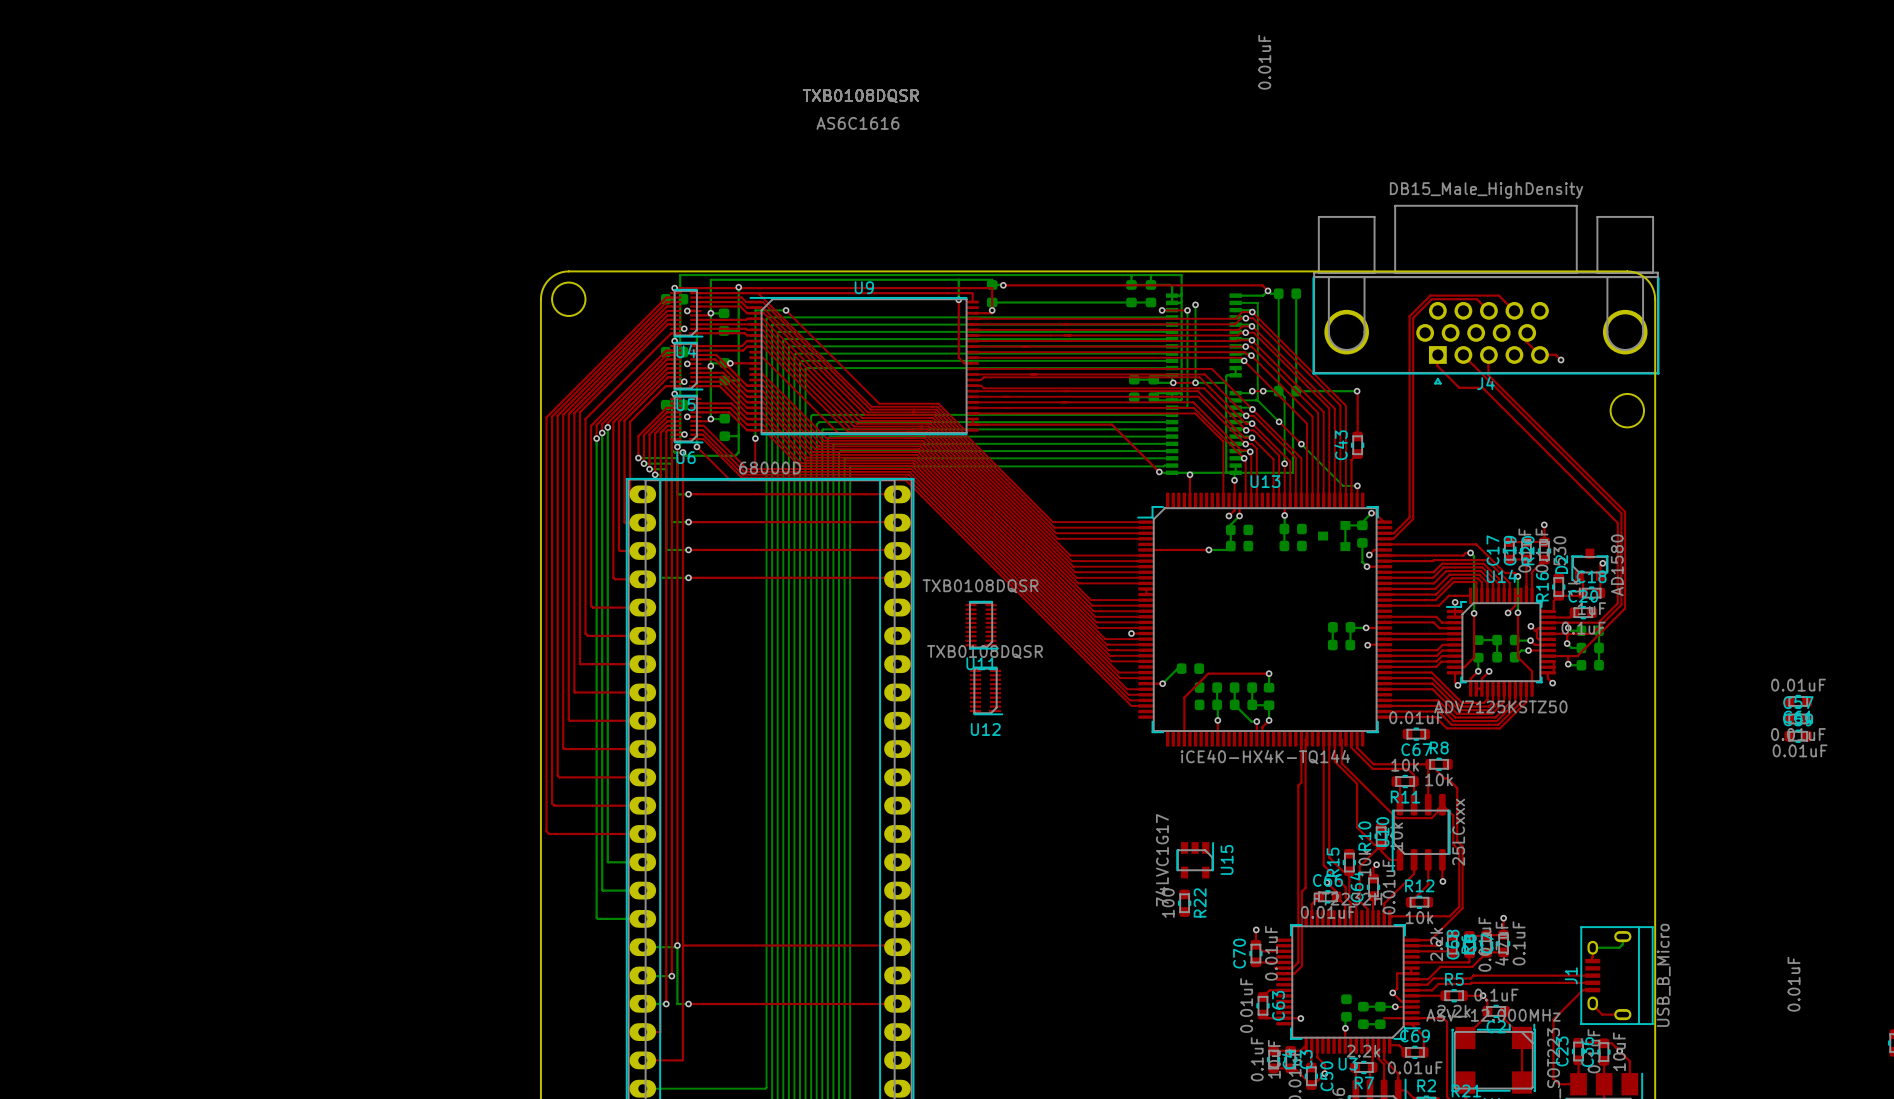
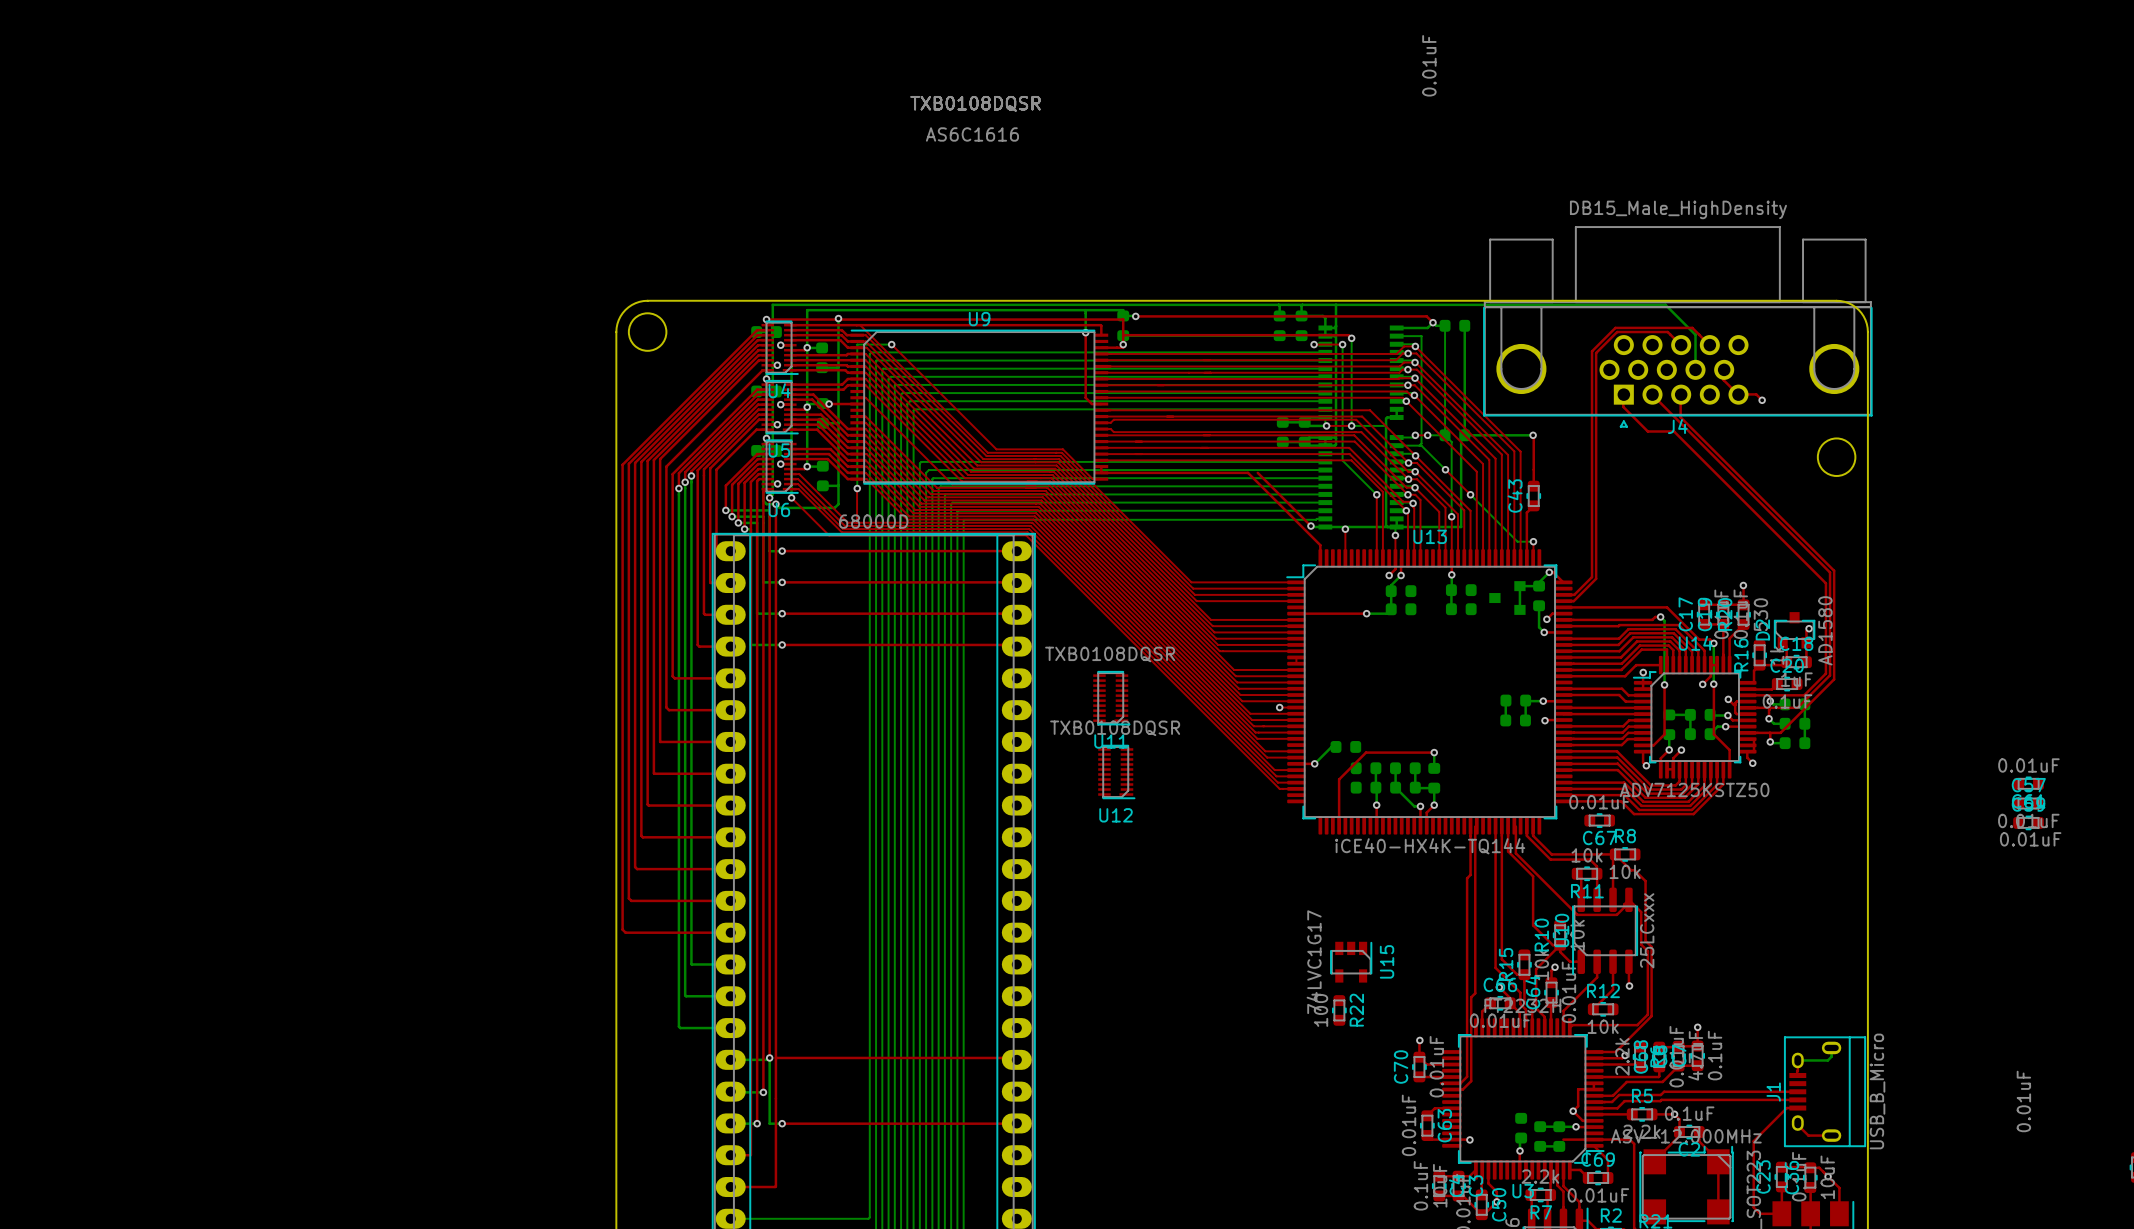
bottom track: none -> (1335, 304) (1665, 304) (1695, 334) (1695, 369)
top track: none -> (1123, 335) (1348, 335) (1351, 338)
bottom track: none -> (1342, 453) (1342, 460) (1376, 494)
top track: (1103, 424) (1111, 424) -> (1248, 472) (1320, 545) (1320, 558)
top track: none -> (1376, 494) (1376, 558)
via: none -> (1376, 494)

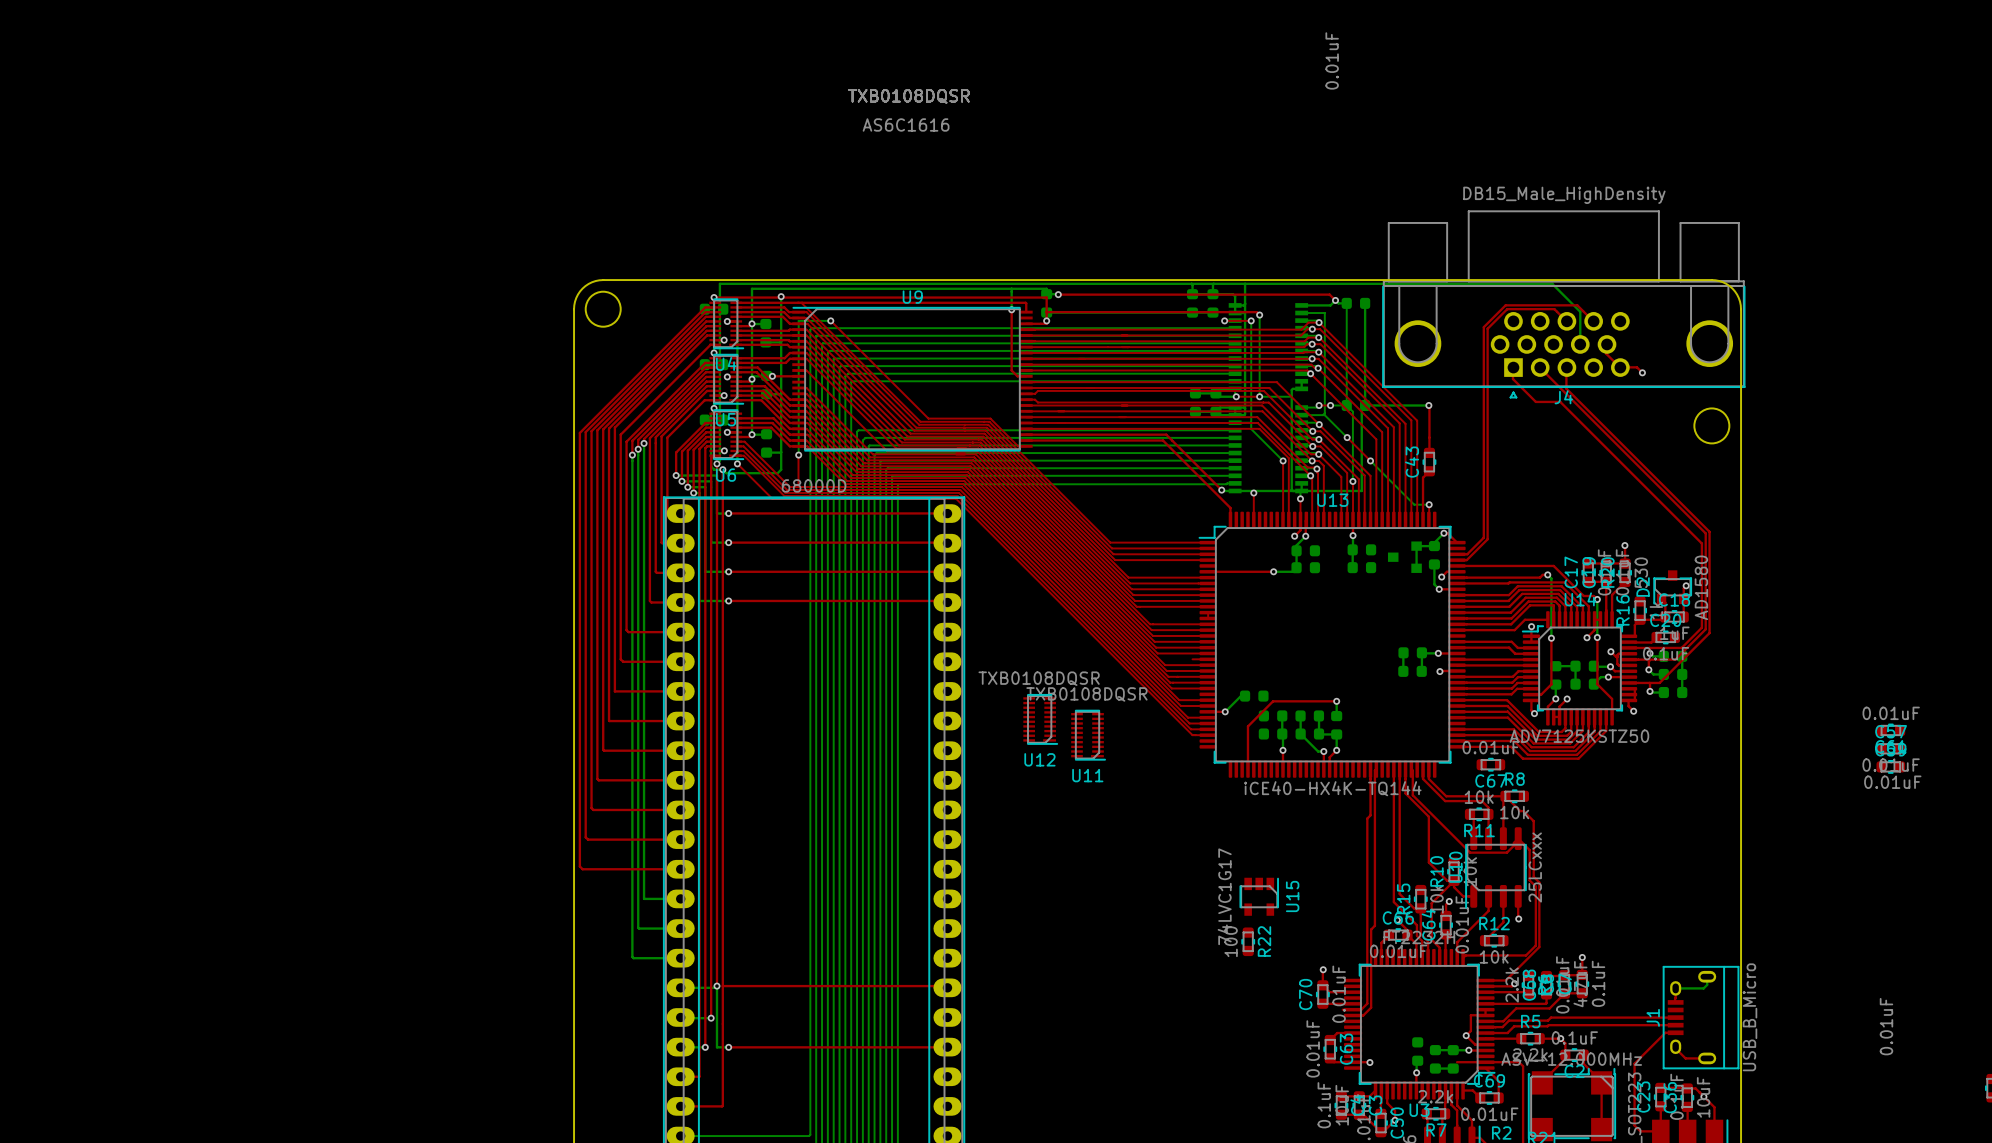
top track: (1101, 466) (1101, 472) -> (1026, 434) (1166, 434) (1172, 440)
U11 position: (1111, 698) -> (1088, 735)
via: (1279, 707) -> none

